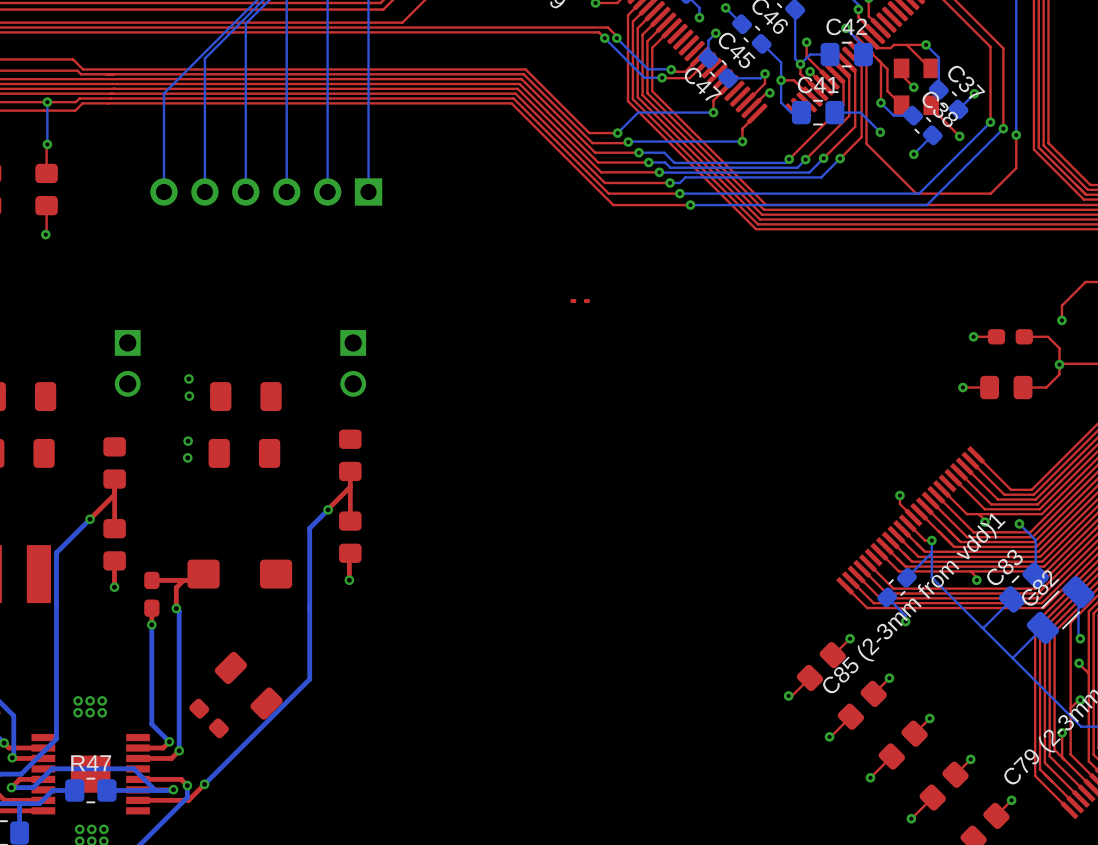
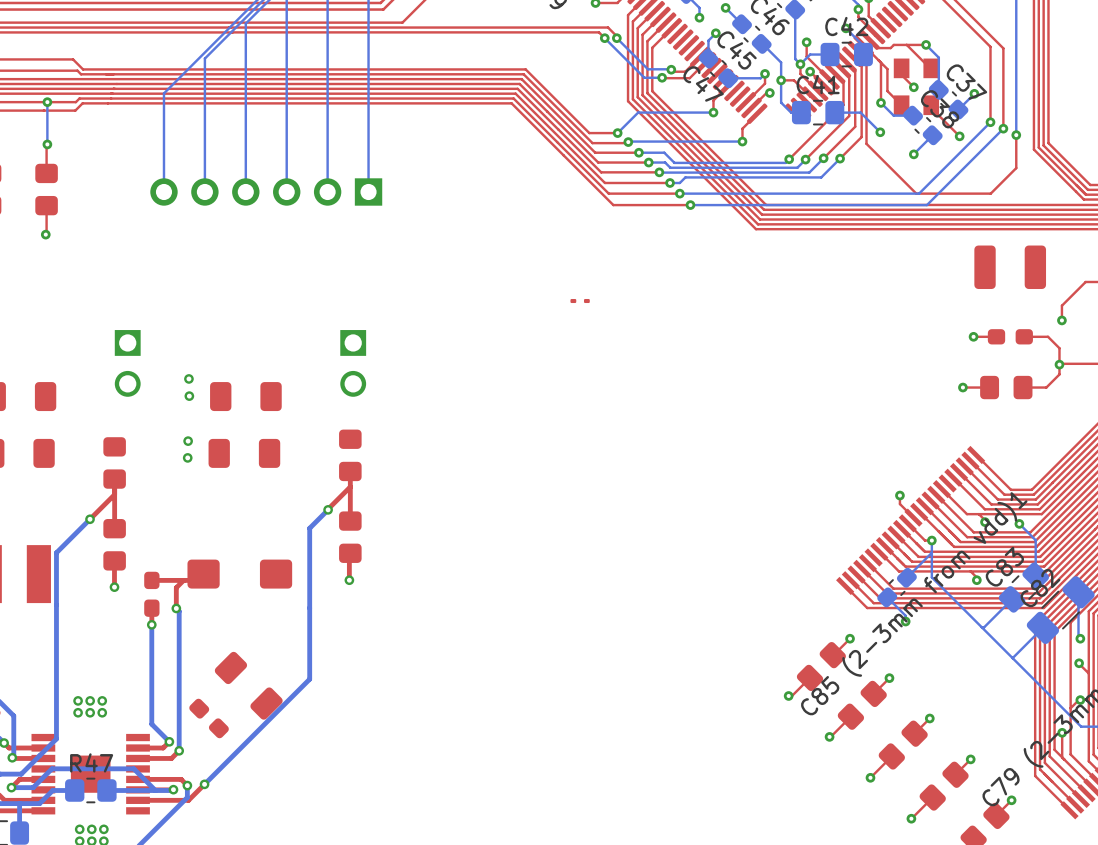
part: none -> (1010, 267)

